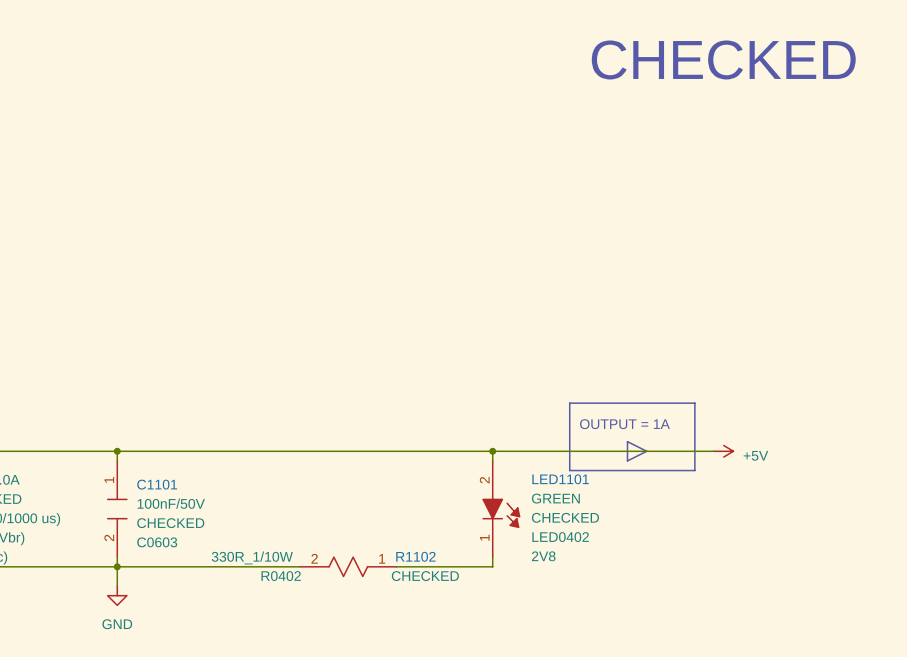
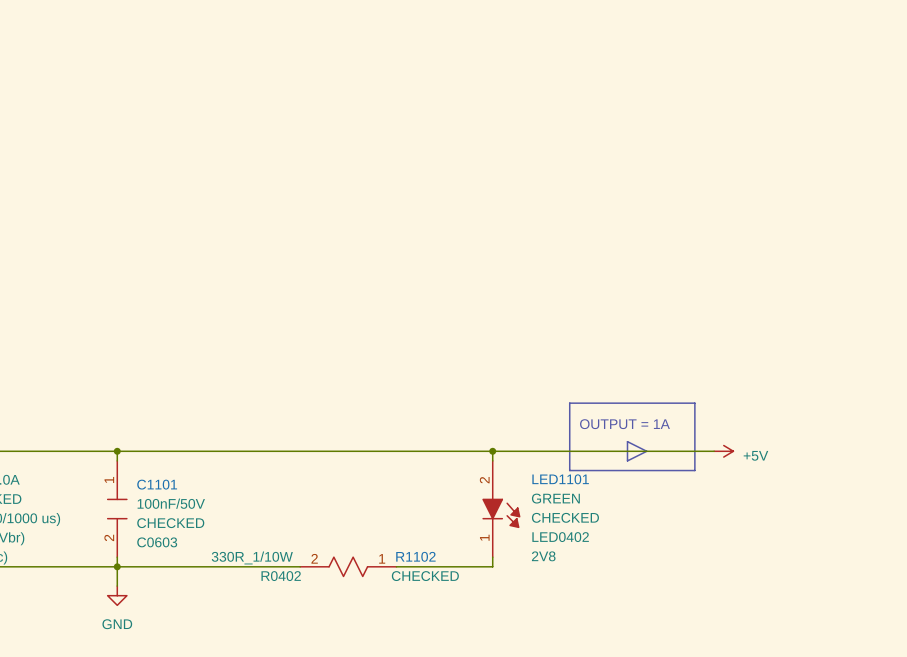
text: CHECKED (723, 59) -> none

